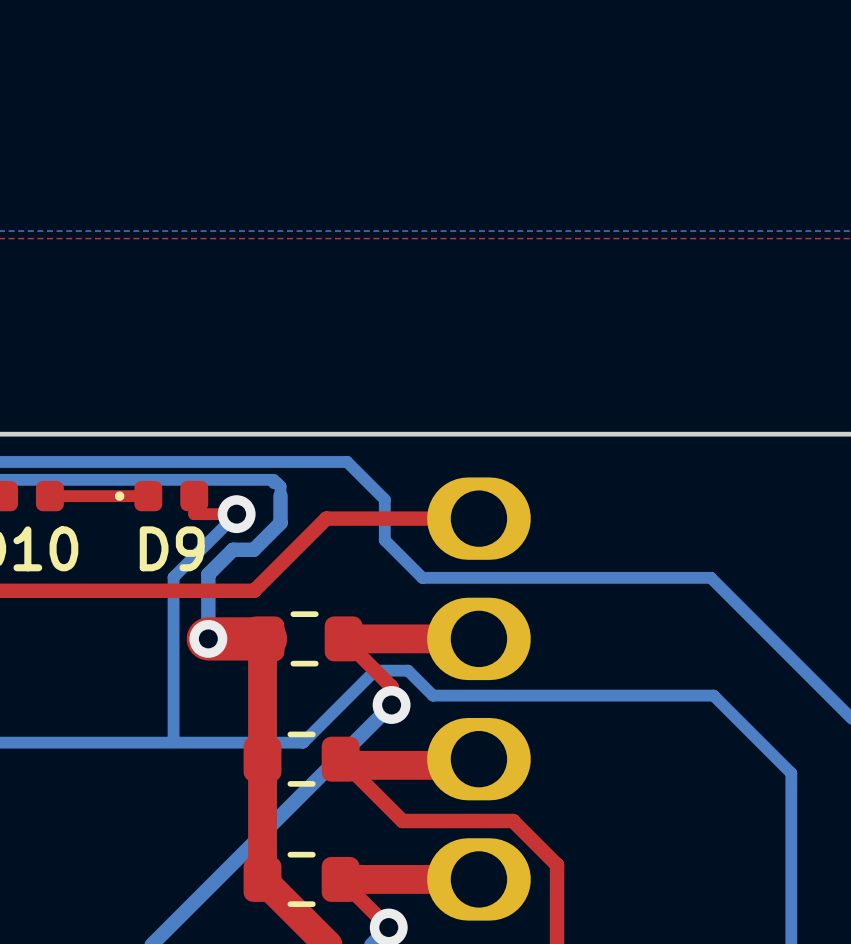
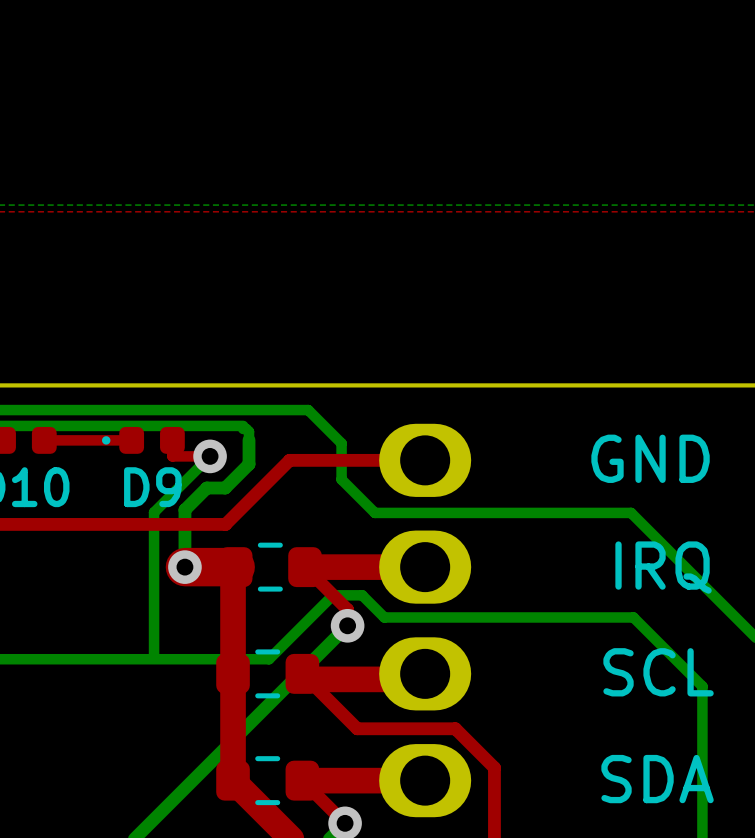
text: none -> GND (650, 458)
text: none -> IRQ (663, 567)
text: none -> SCL (658, 672)
text: none -> SDA (657, 779)

